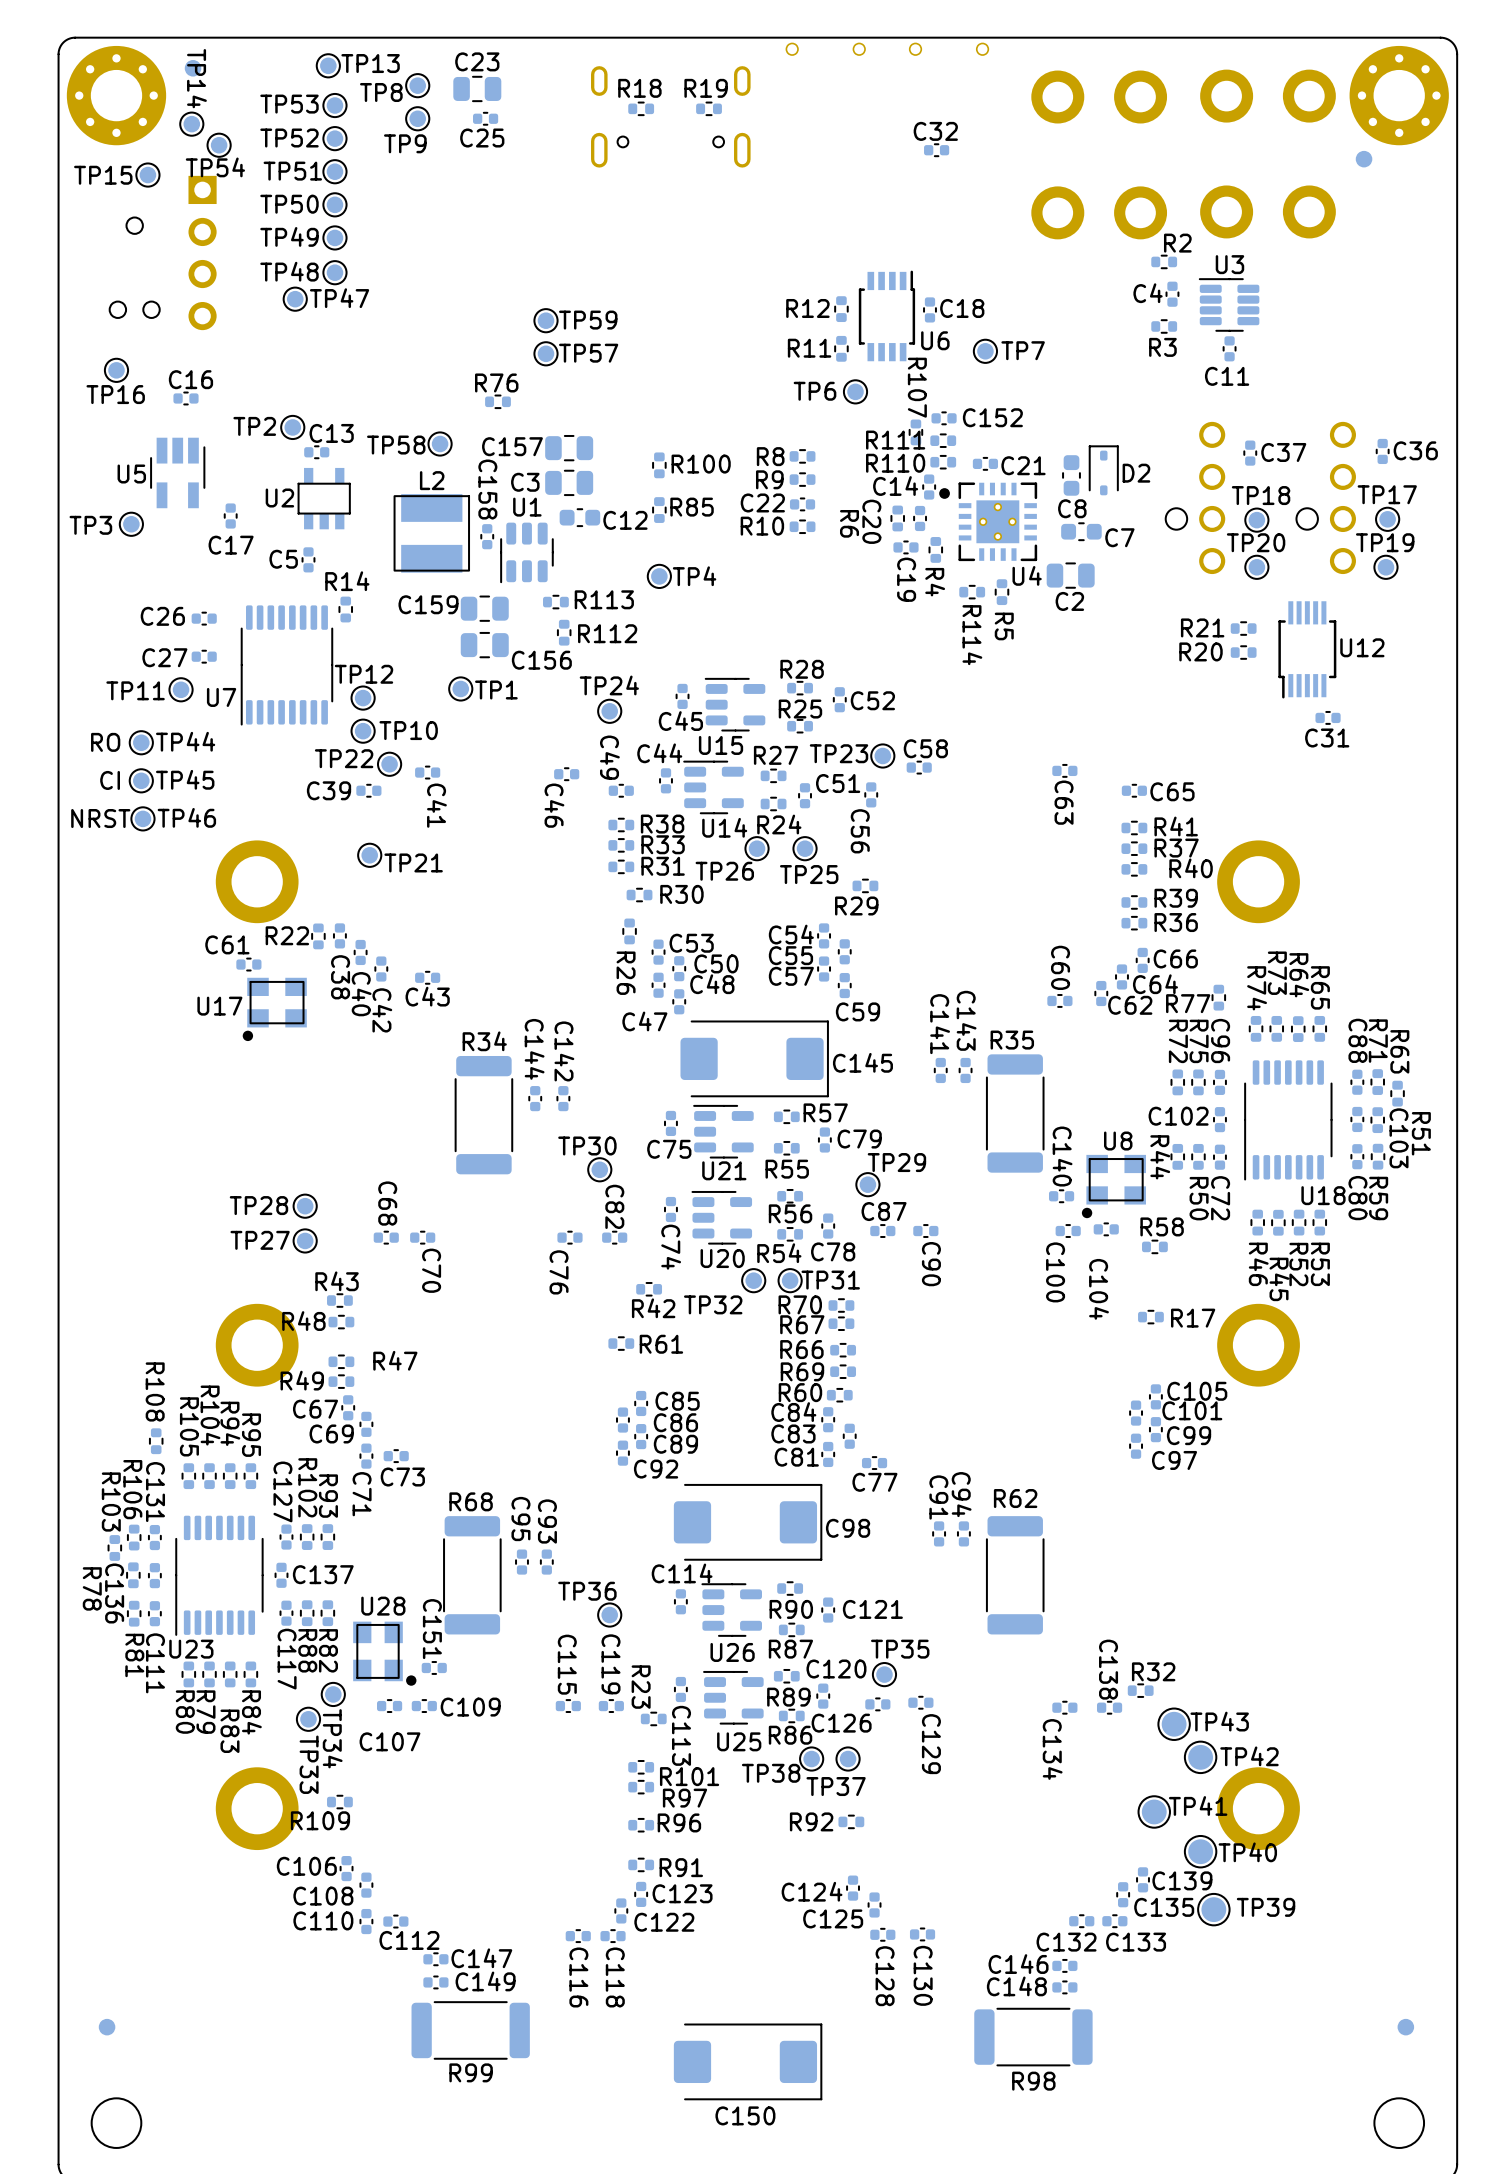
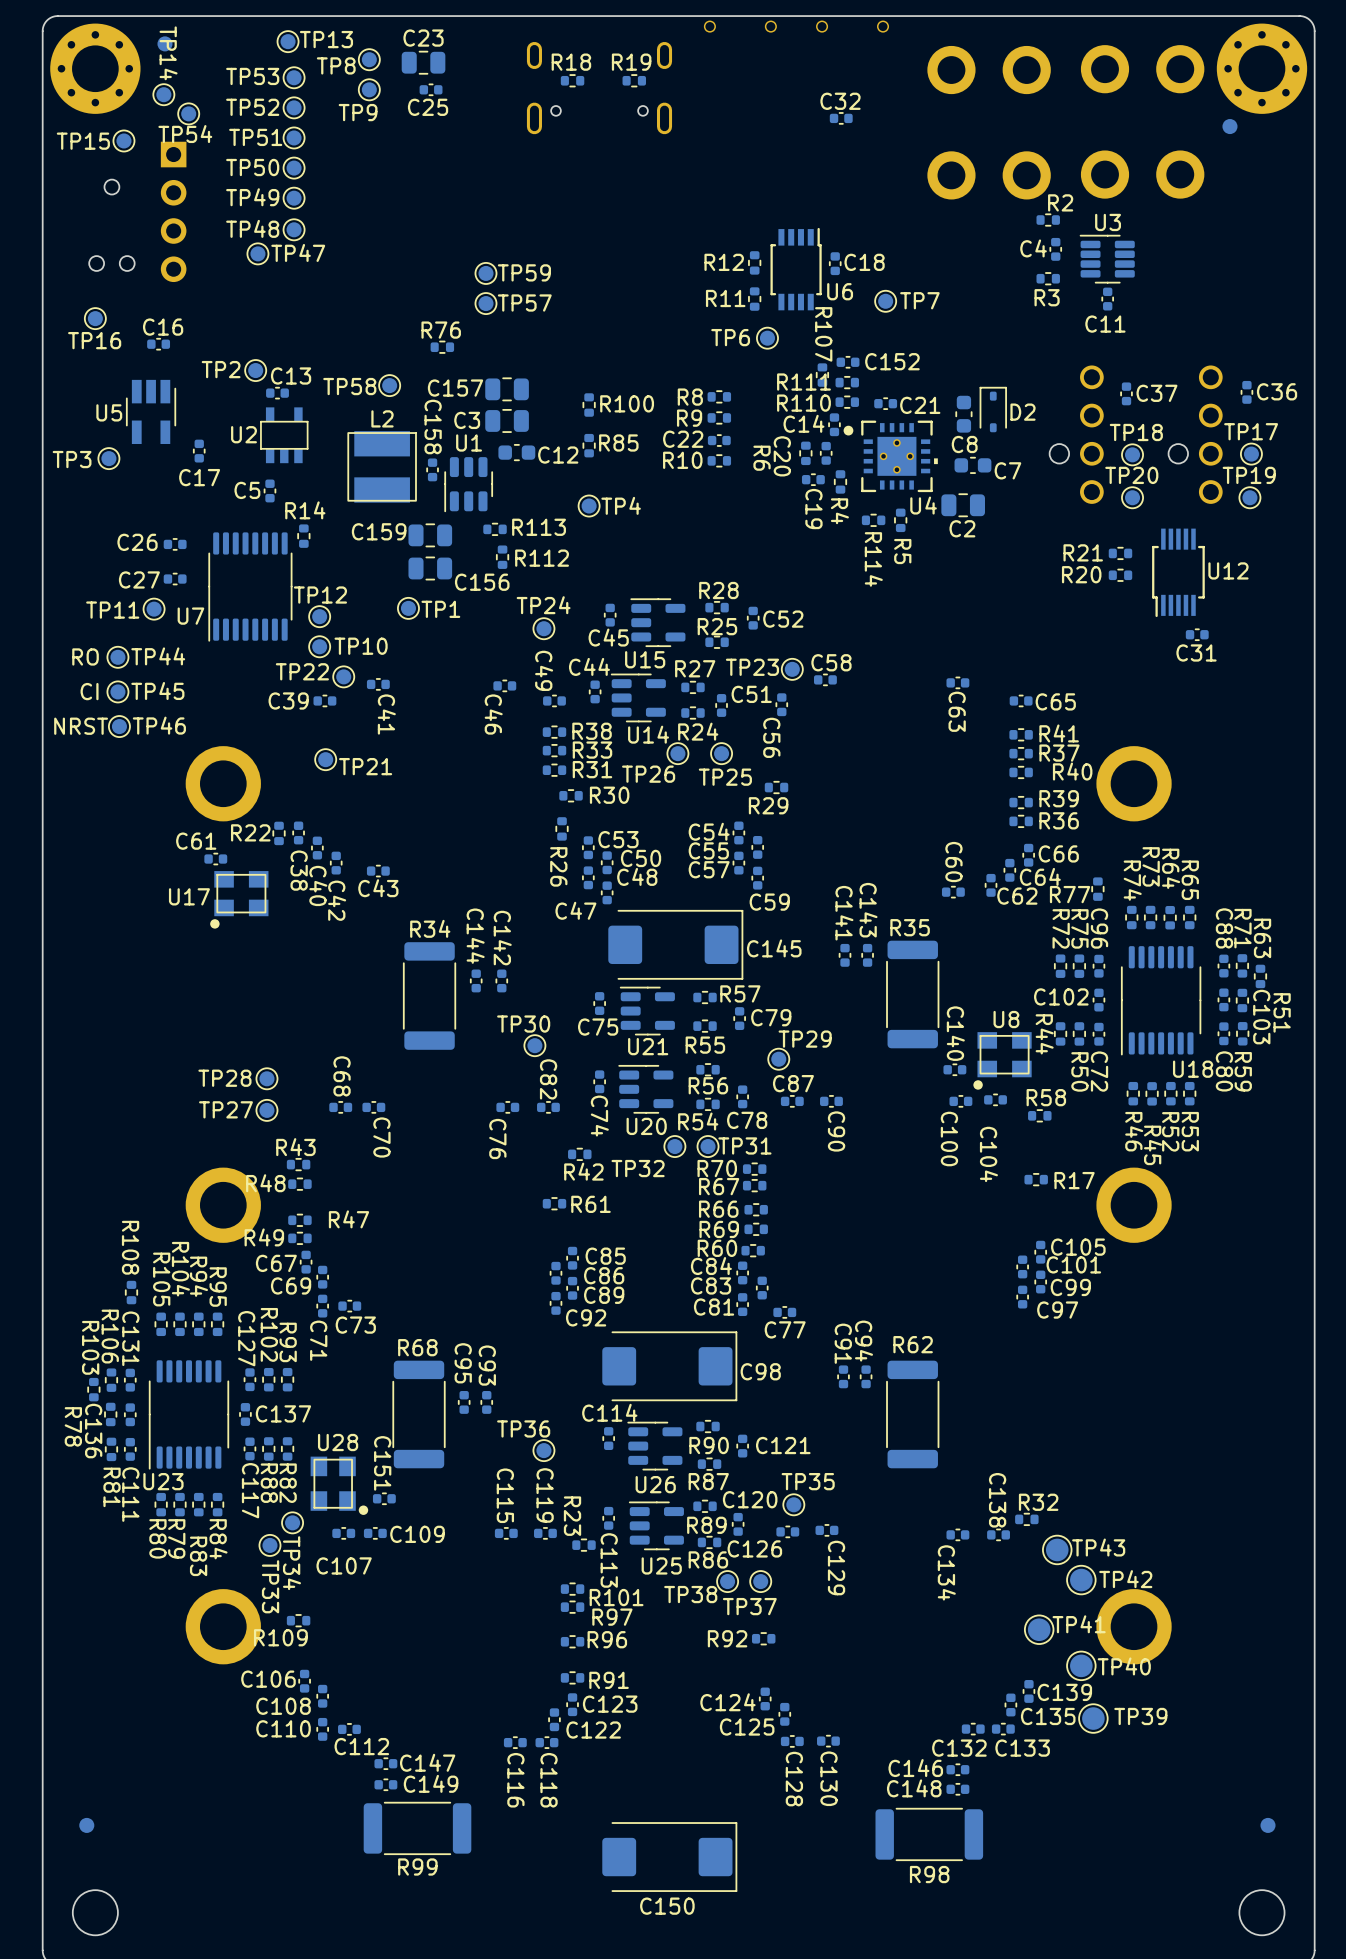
U4 footprint: [939, 482, 1038, 562] -> [843, 420, 938, 493]

